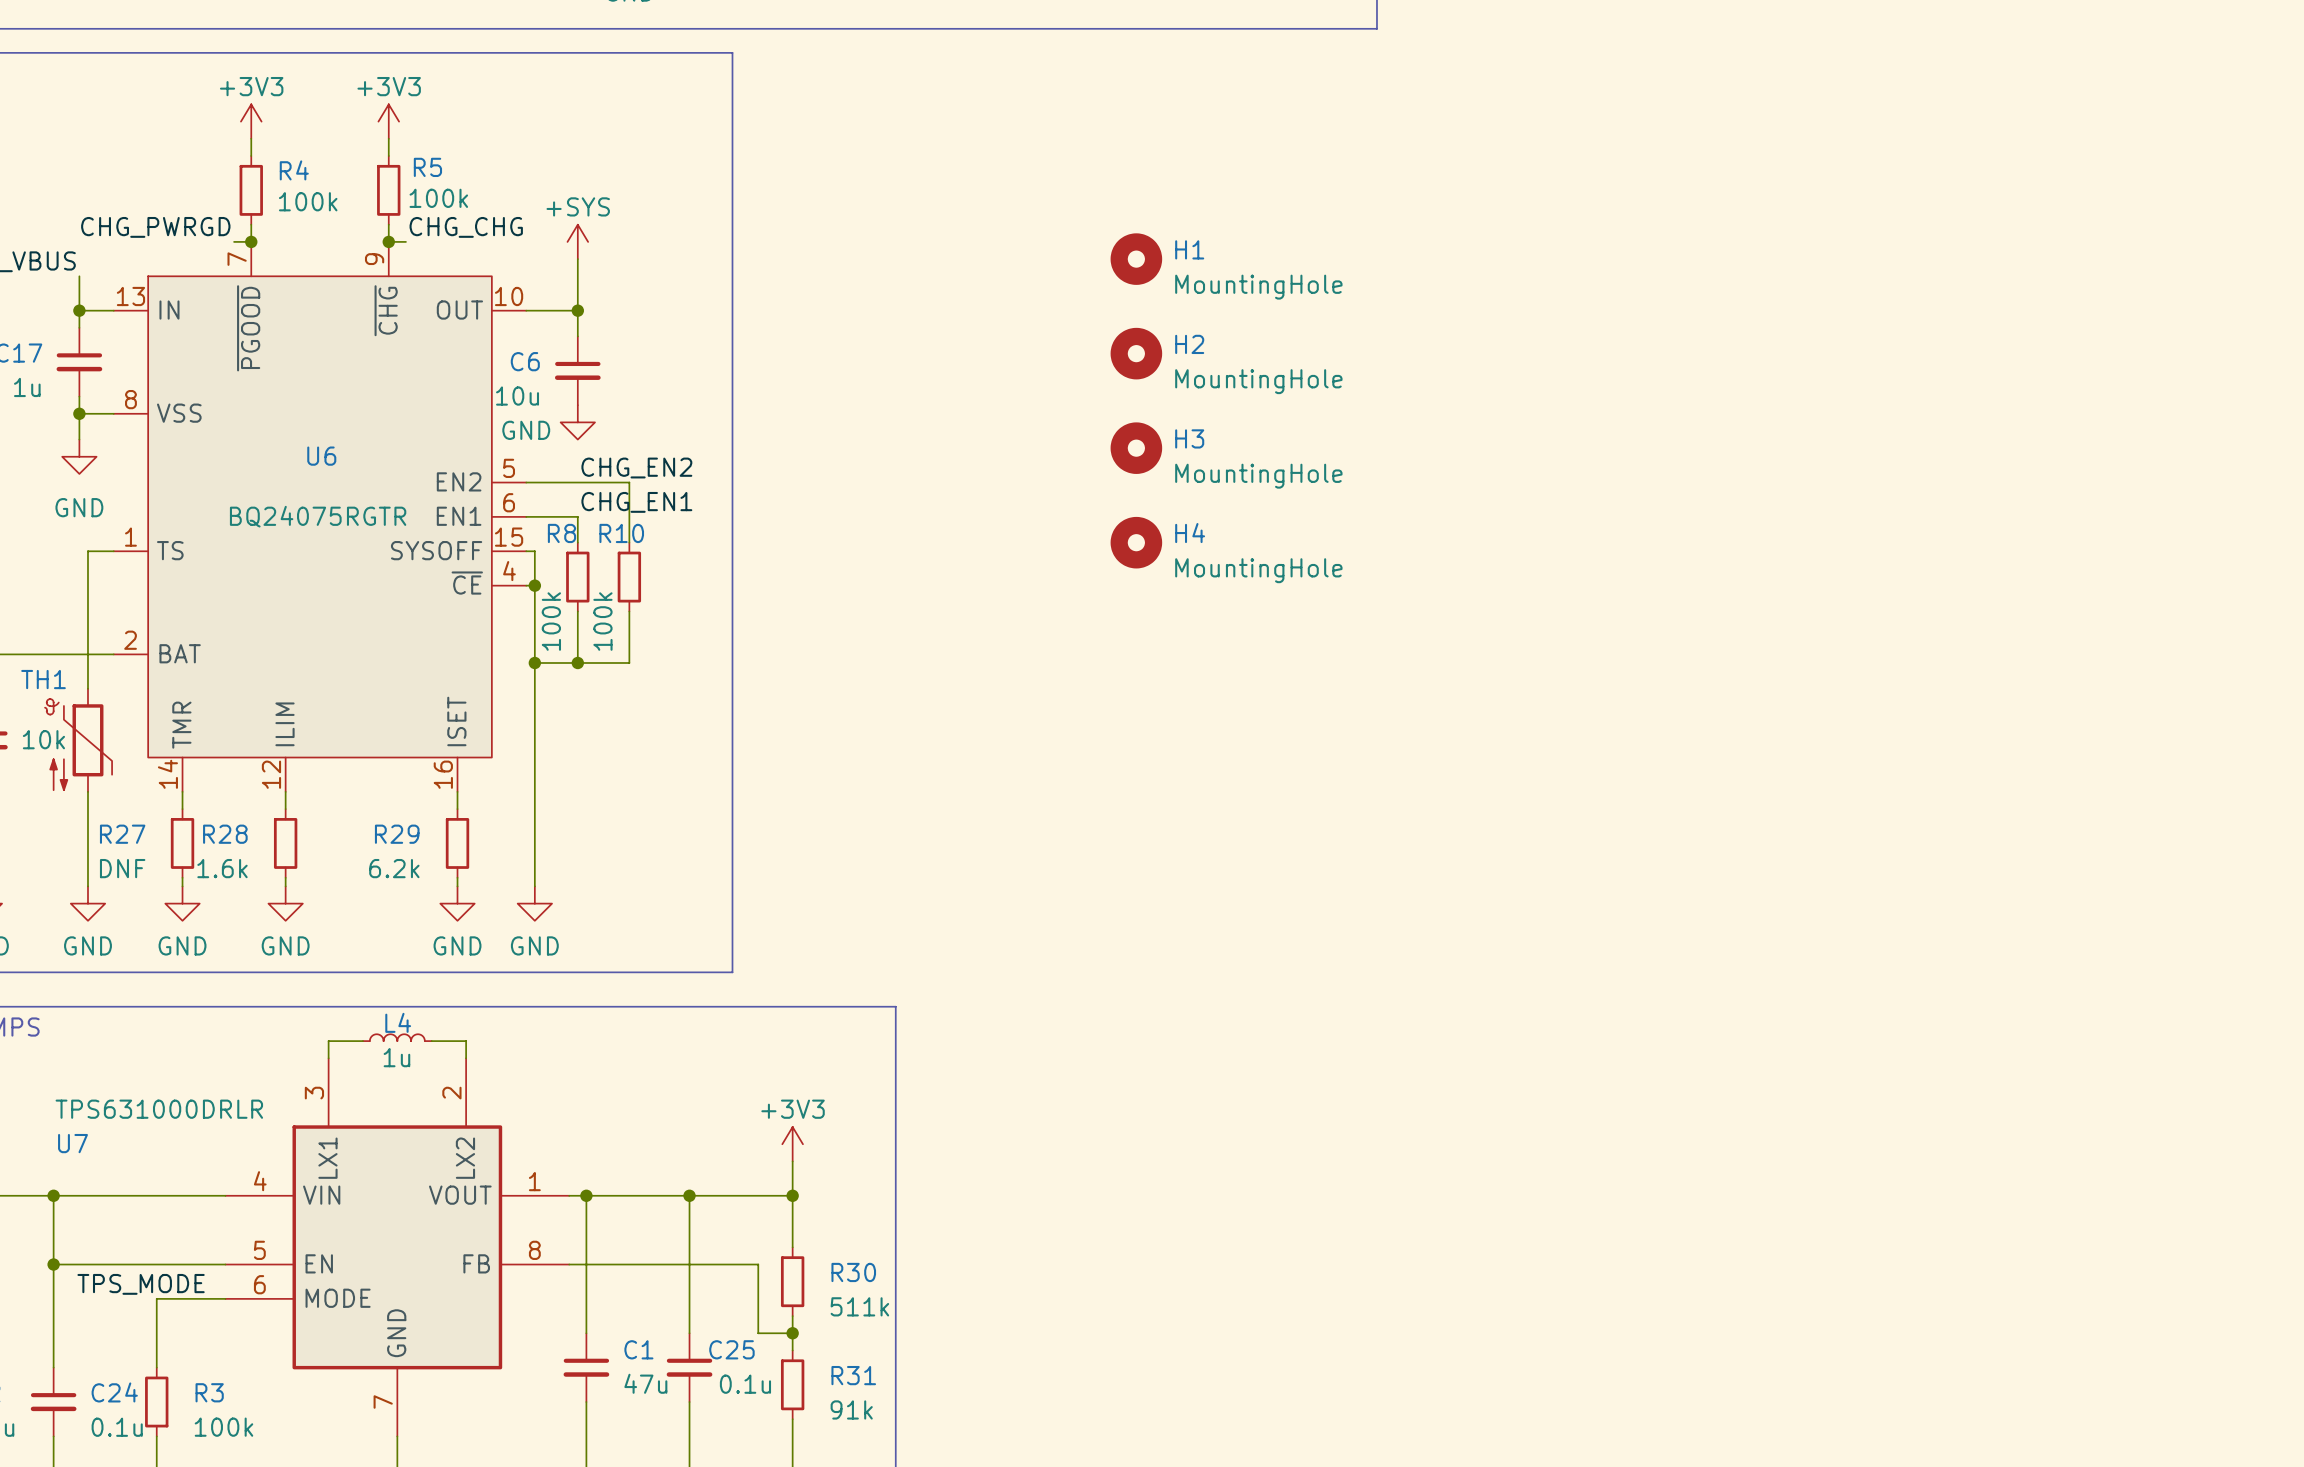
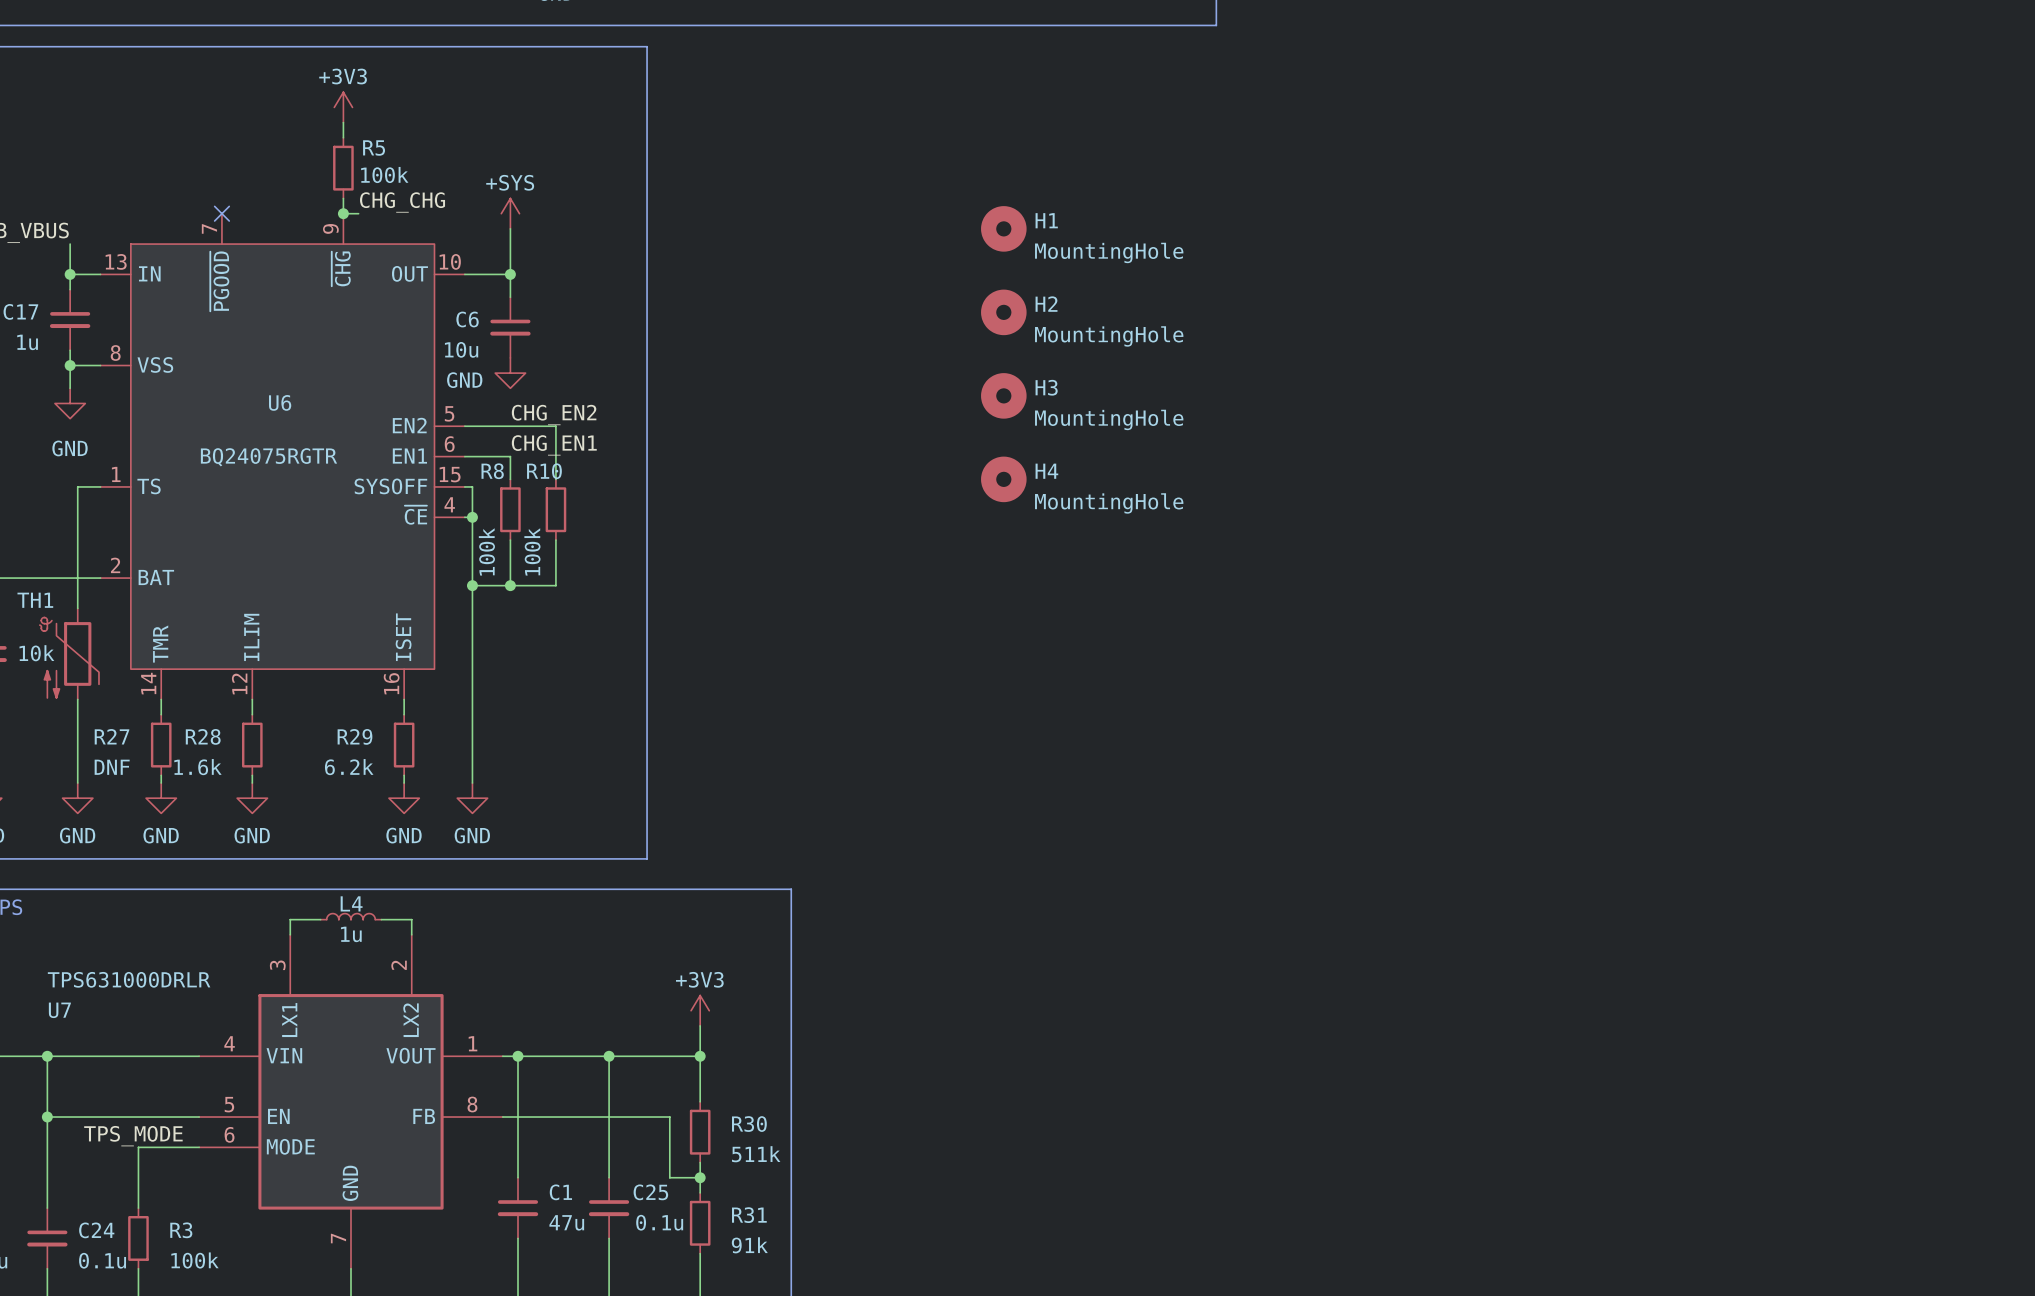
power symbol: +3V3 (251, 121) -> none
wire: (251, 138) (251, 155) -> none
R4: 100k (251, 190) -> none
wire: (251, 224) (251, 241) (234, 241) -> none
label: CHG_PWRGD (155, 227) -> none
junction: (251, 241) -> none
no-connect mark: none -> (221, 213)

